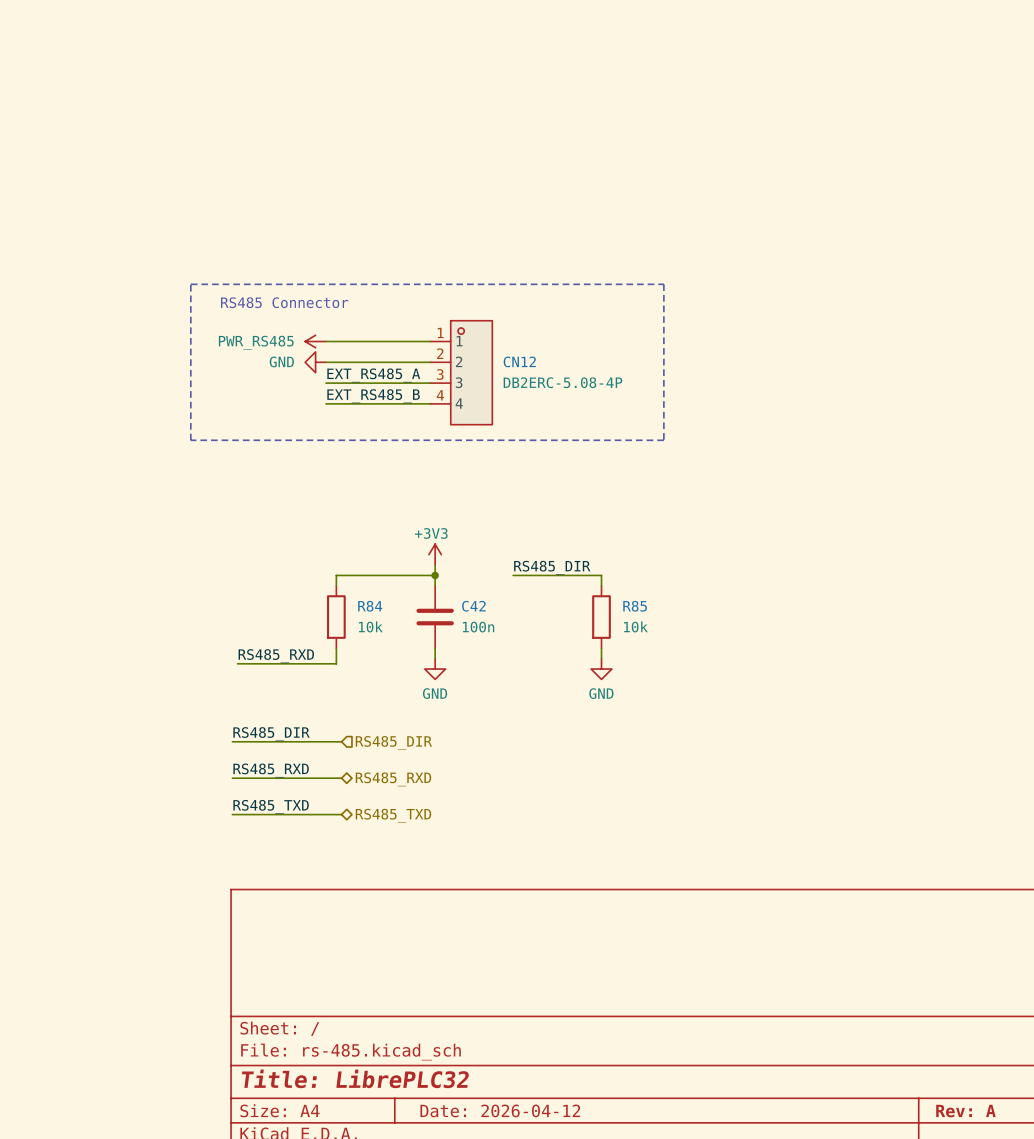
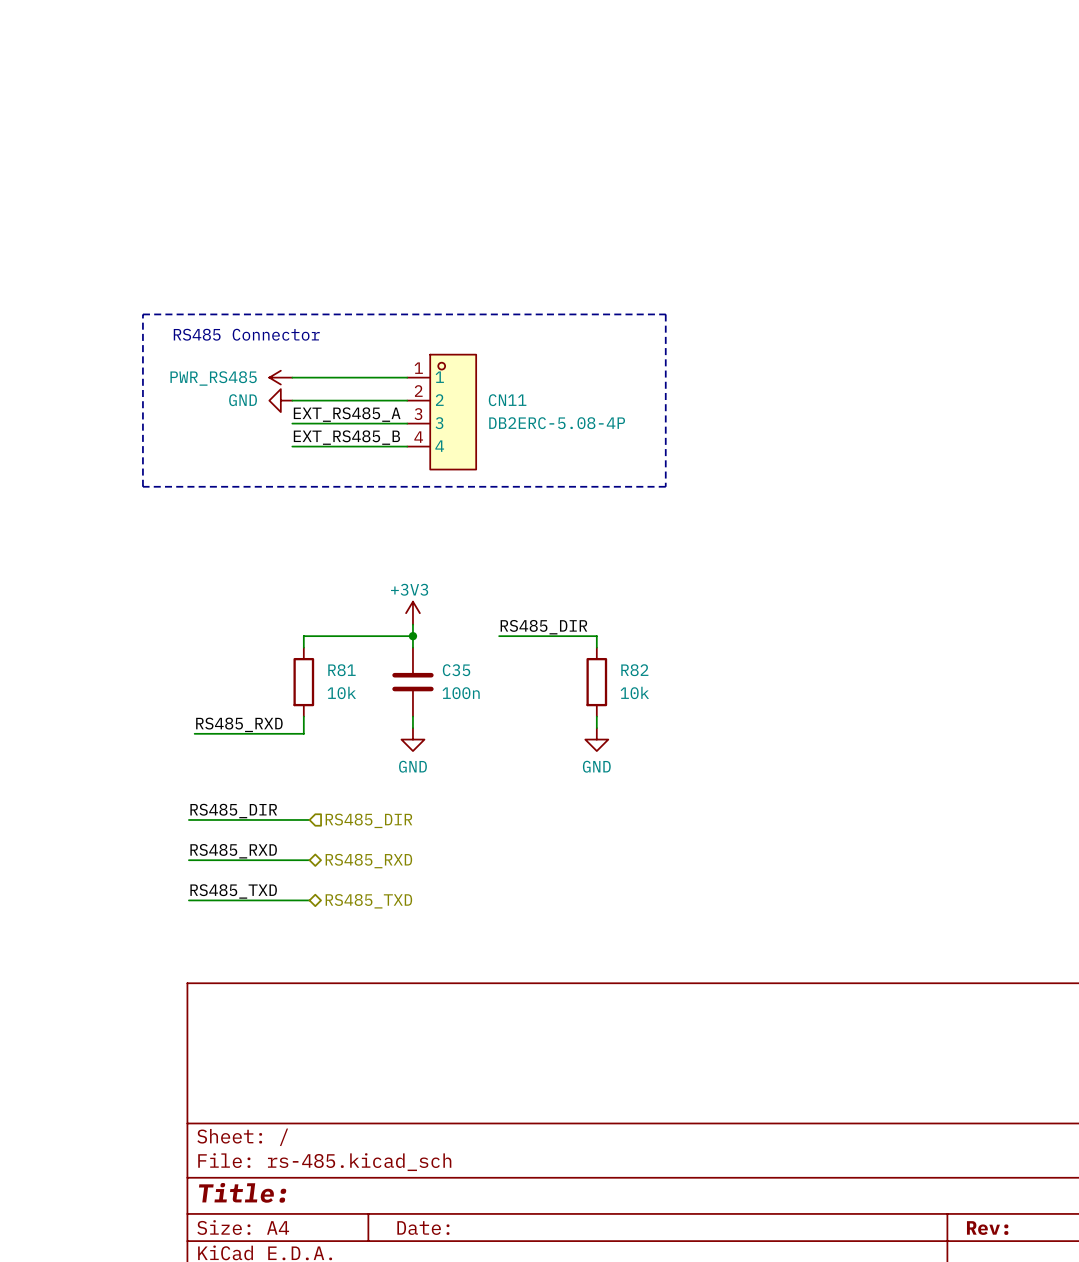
CN12 name: CN12 (519, 361) -> CN11 (507, 400)
R84 name: R84 (370, 606) -> R81 (341, 670)
C42 name: C42 (473, 606) -> C35 (456, 670)
R85 name: R85 (635, 606) -> R82 (634, 670)
title block: Title: LibrePLC32 (355, 1078) -> Title: (242, 1192)
title block: Date: 2026-04-12 (500, 1110) -> Date: (423, 1228)
title block: Rev: A (965, 1111) -> Rev: (987, 1228)

